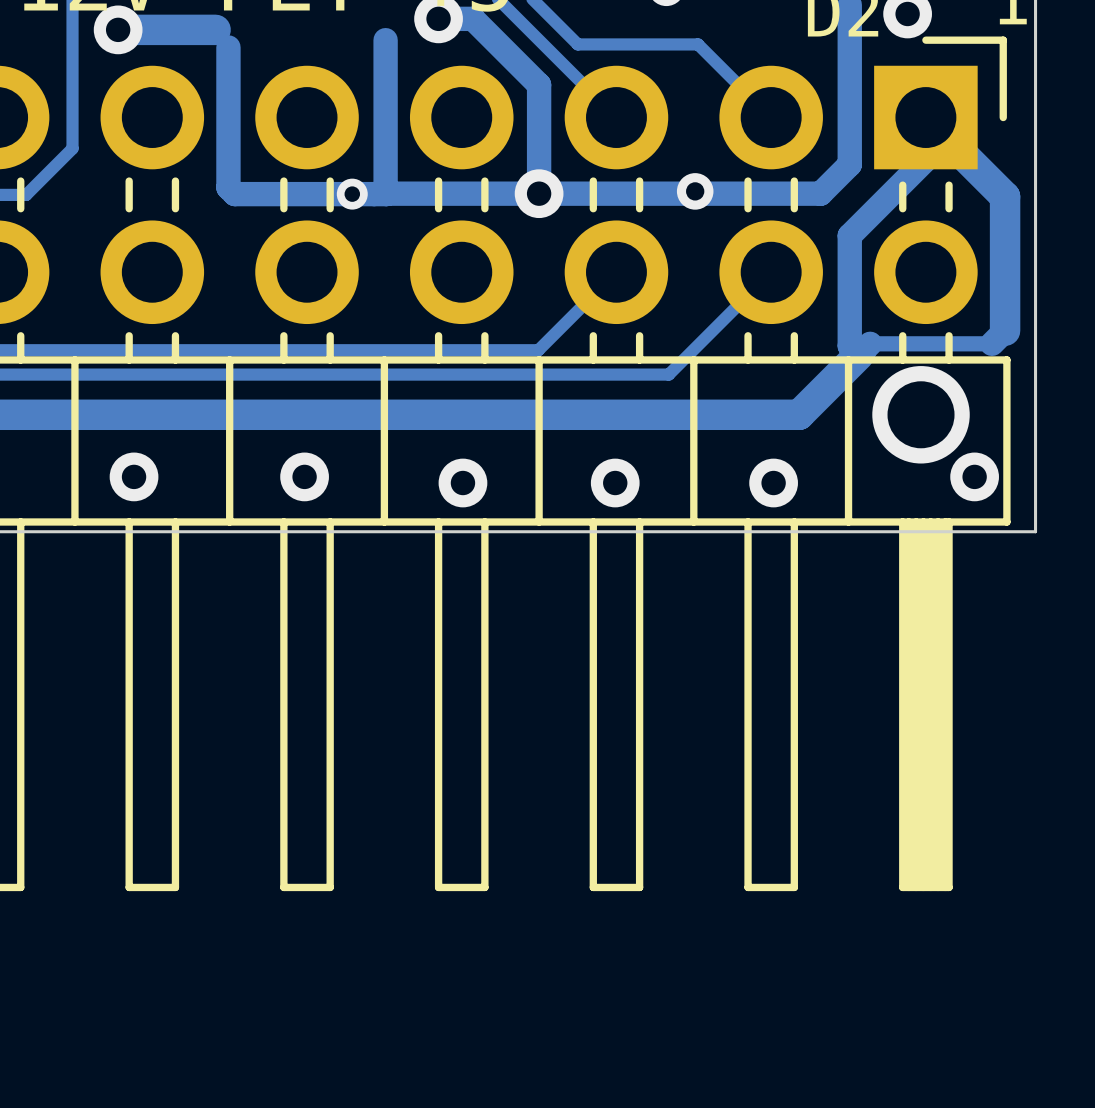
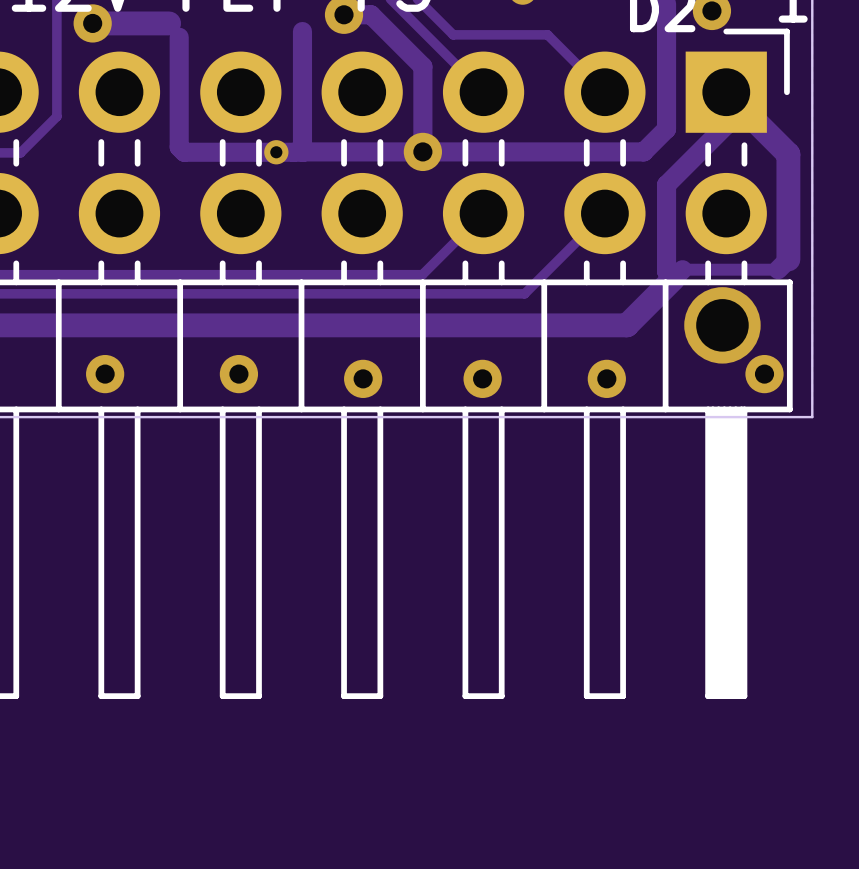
via: (695, 191) -> none

